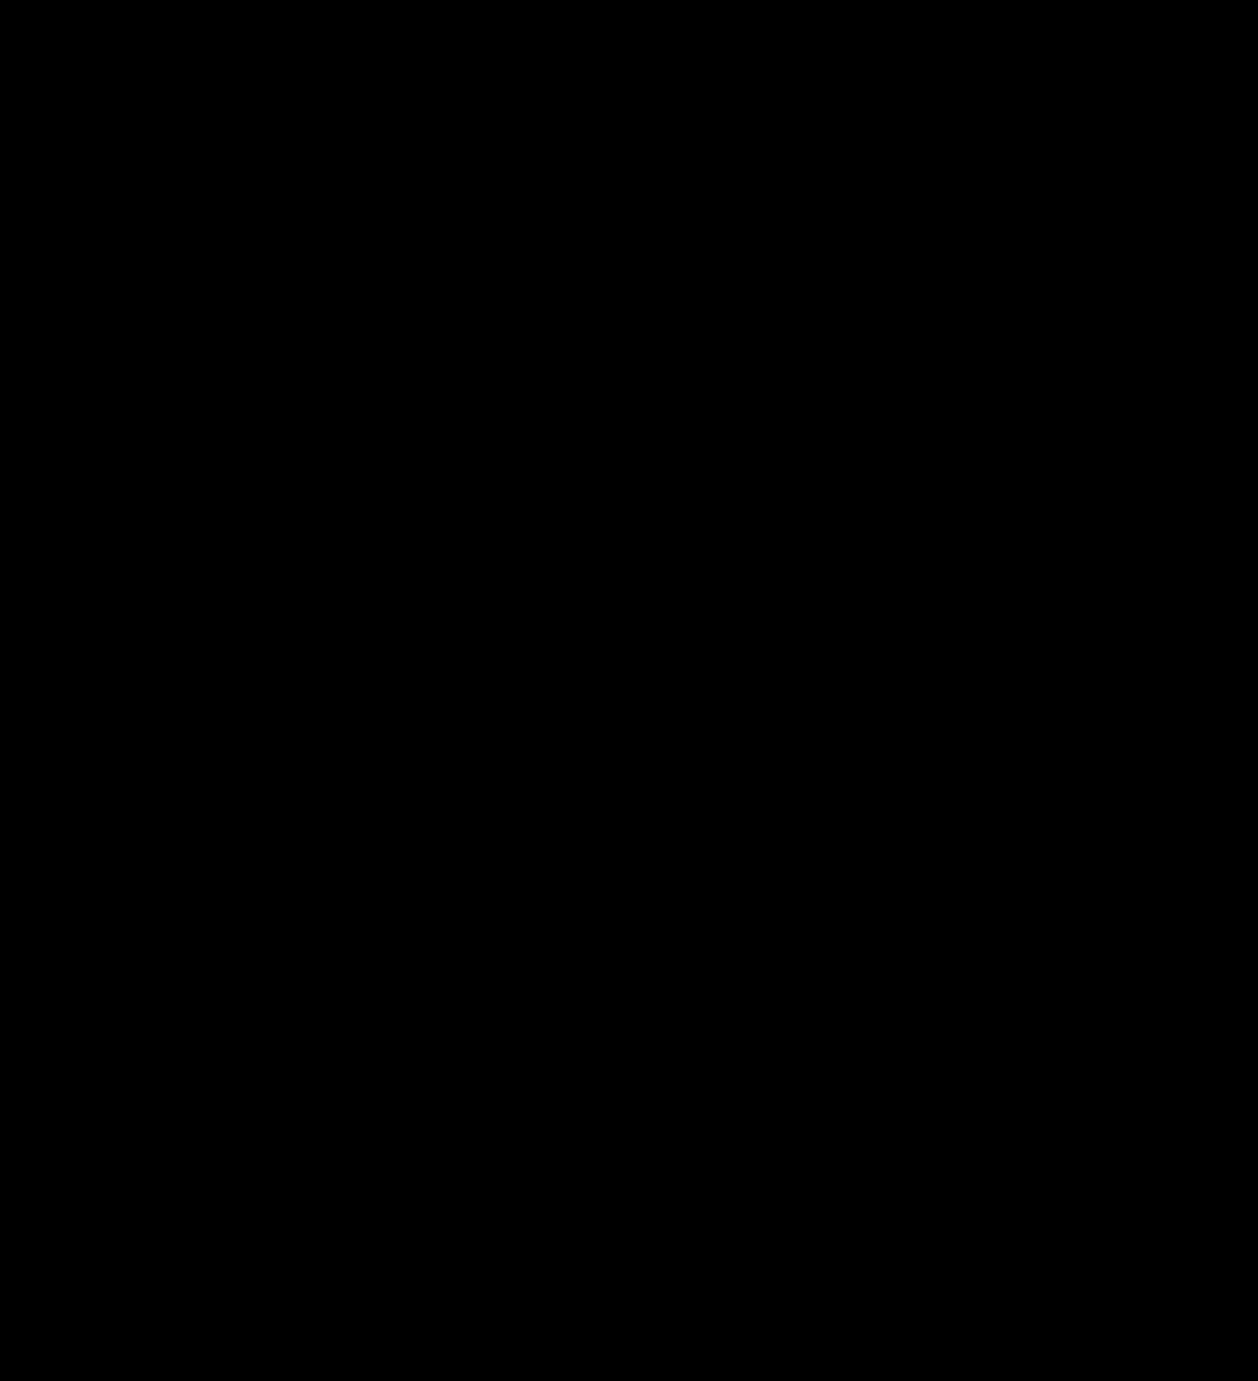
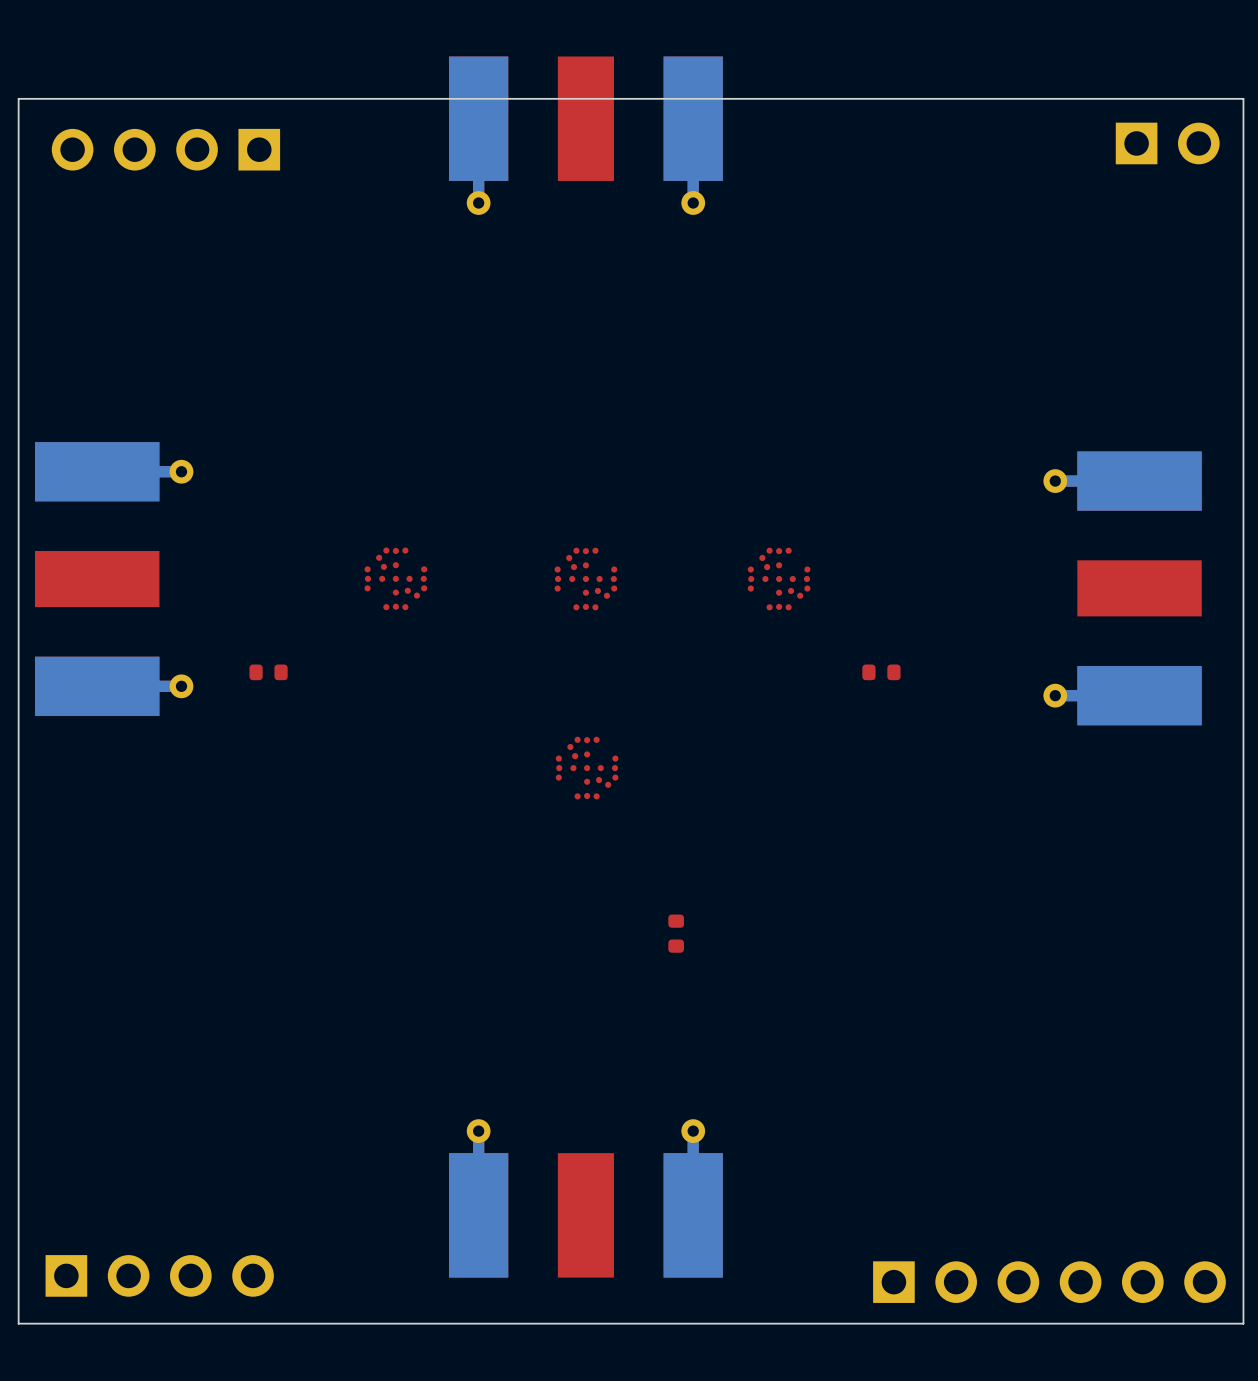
board edge: none -> (1243, 98) (18, 98) (18, 1323) (1243, 1323) (1243, 98)
part: none -> (585, 135)
part: none -> (1167, 143)
part: none -> (165, 149)
part: none -> (395, 578)
part: none -> (114, 579)
part: none -> (585, 579)
part: none -> (779, 579)
part: none -> (1122, 588)
part: none -> (268, 672)
part: none -> (881, 672)
part: none -> (587, 768)
part: none -> (676, 933)
part: none -> (585, 1198)
part: none -> (159, 1275)
part: none -> (1049, 1282)

